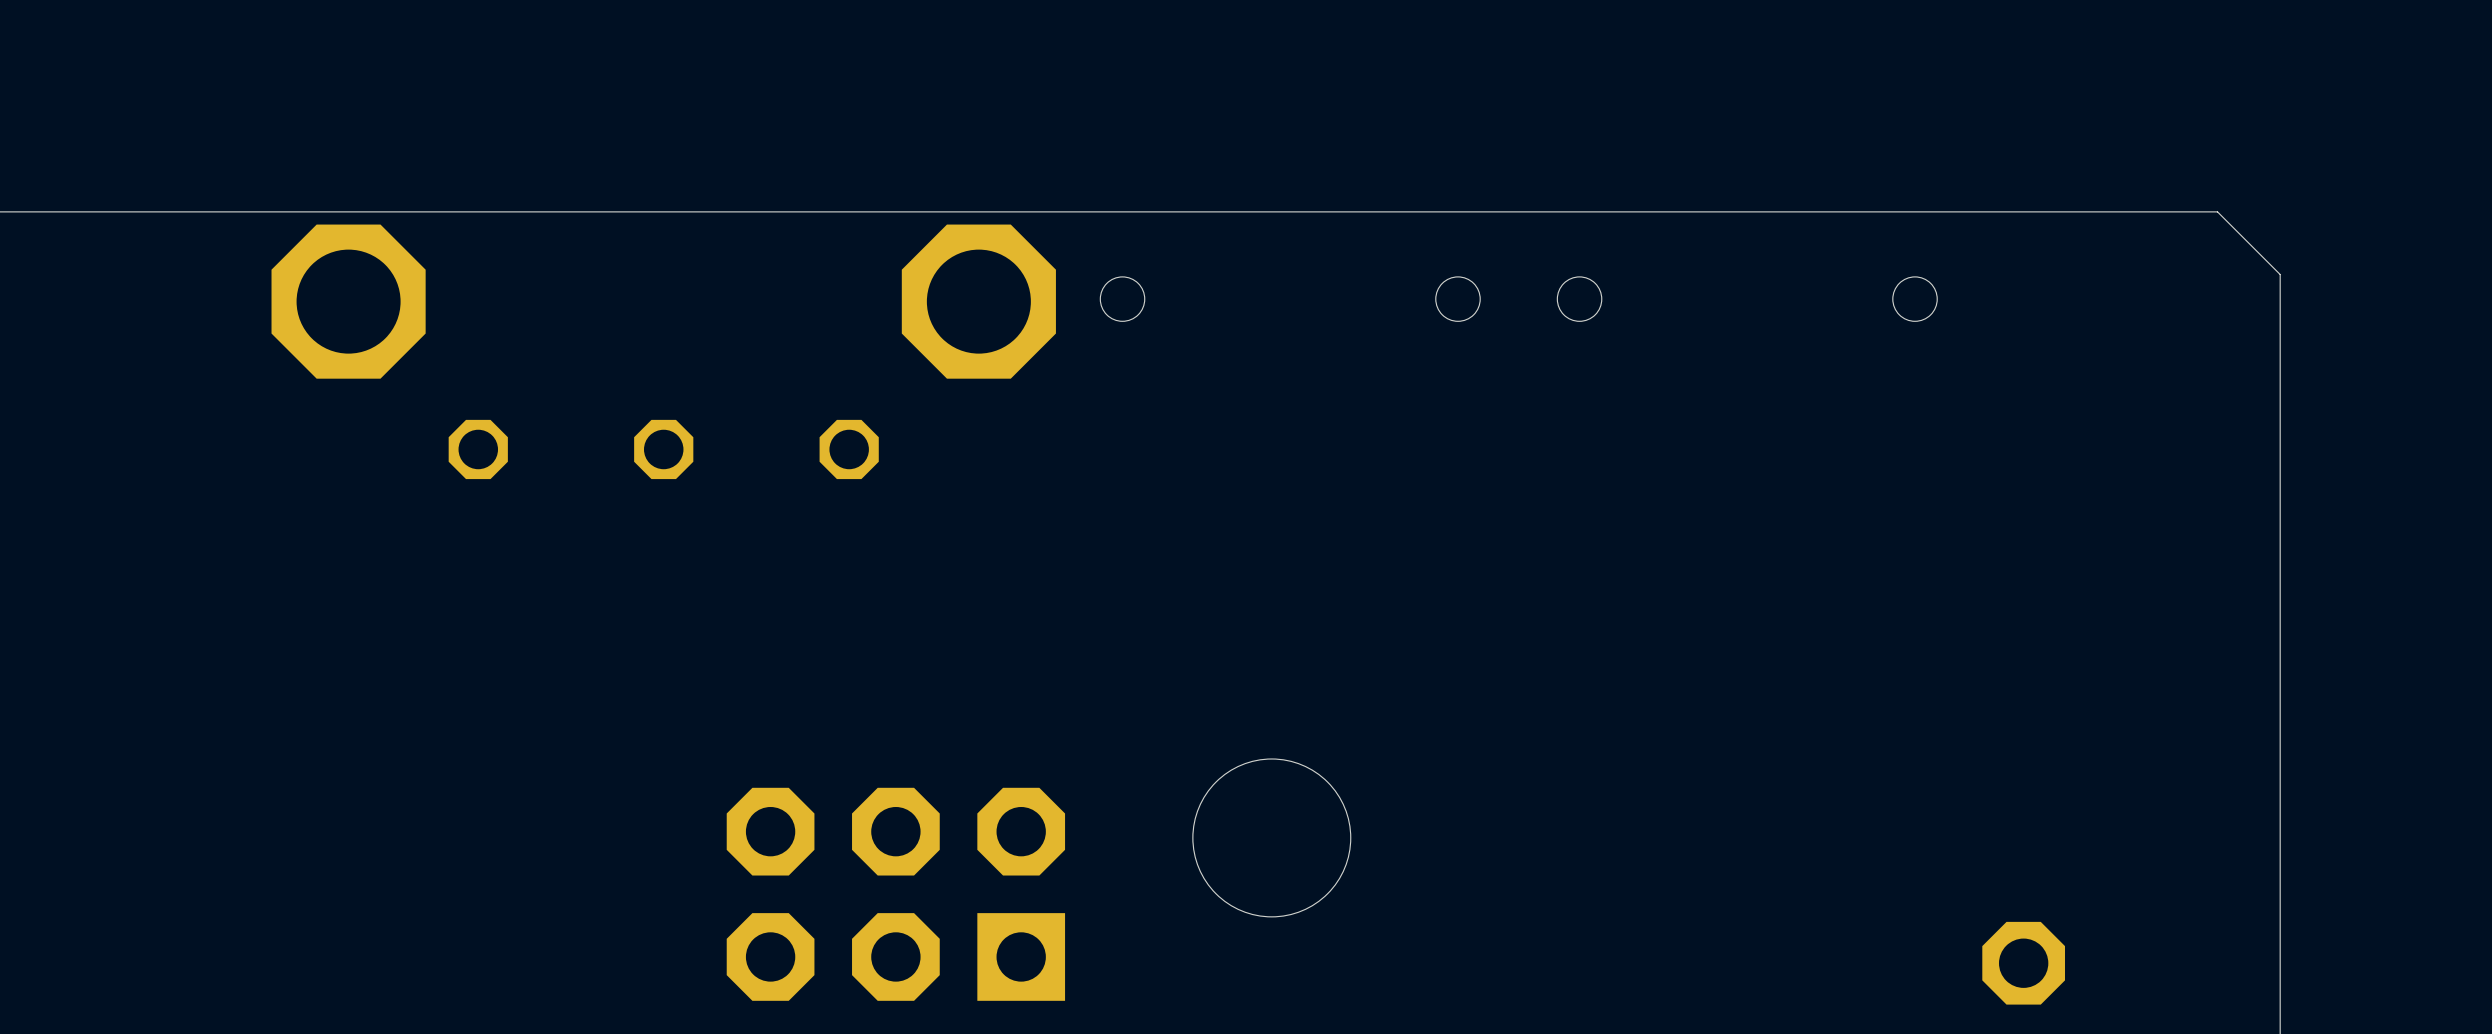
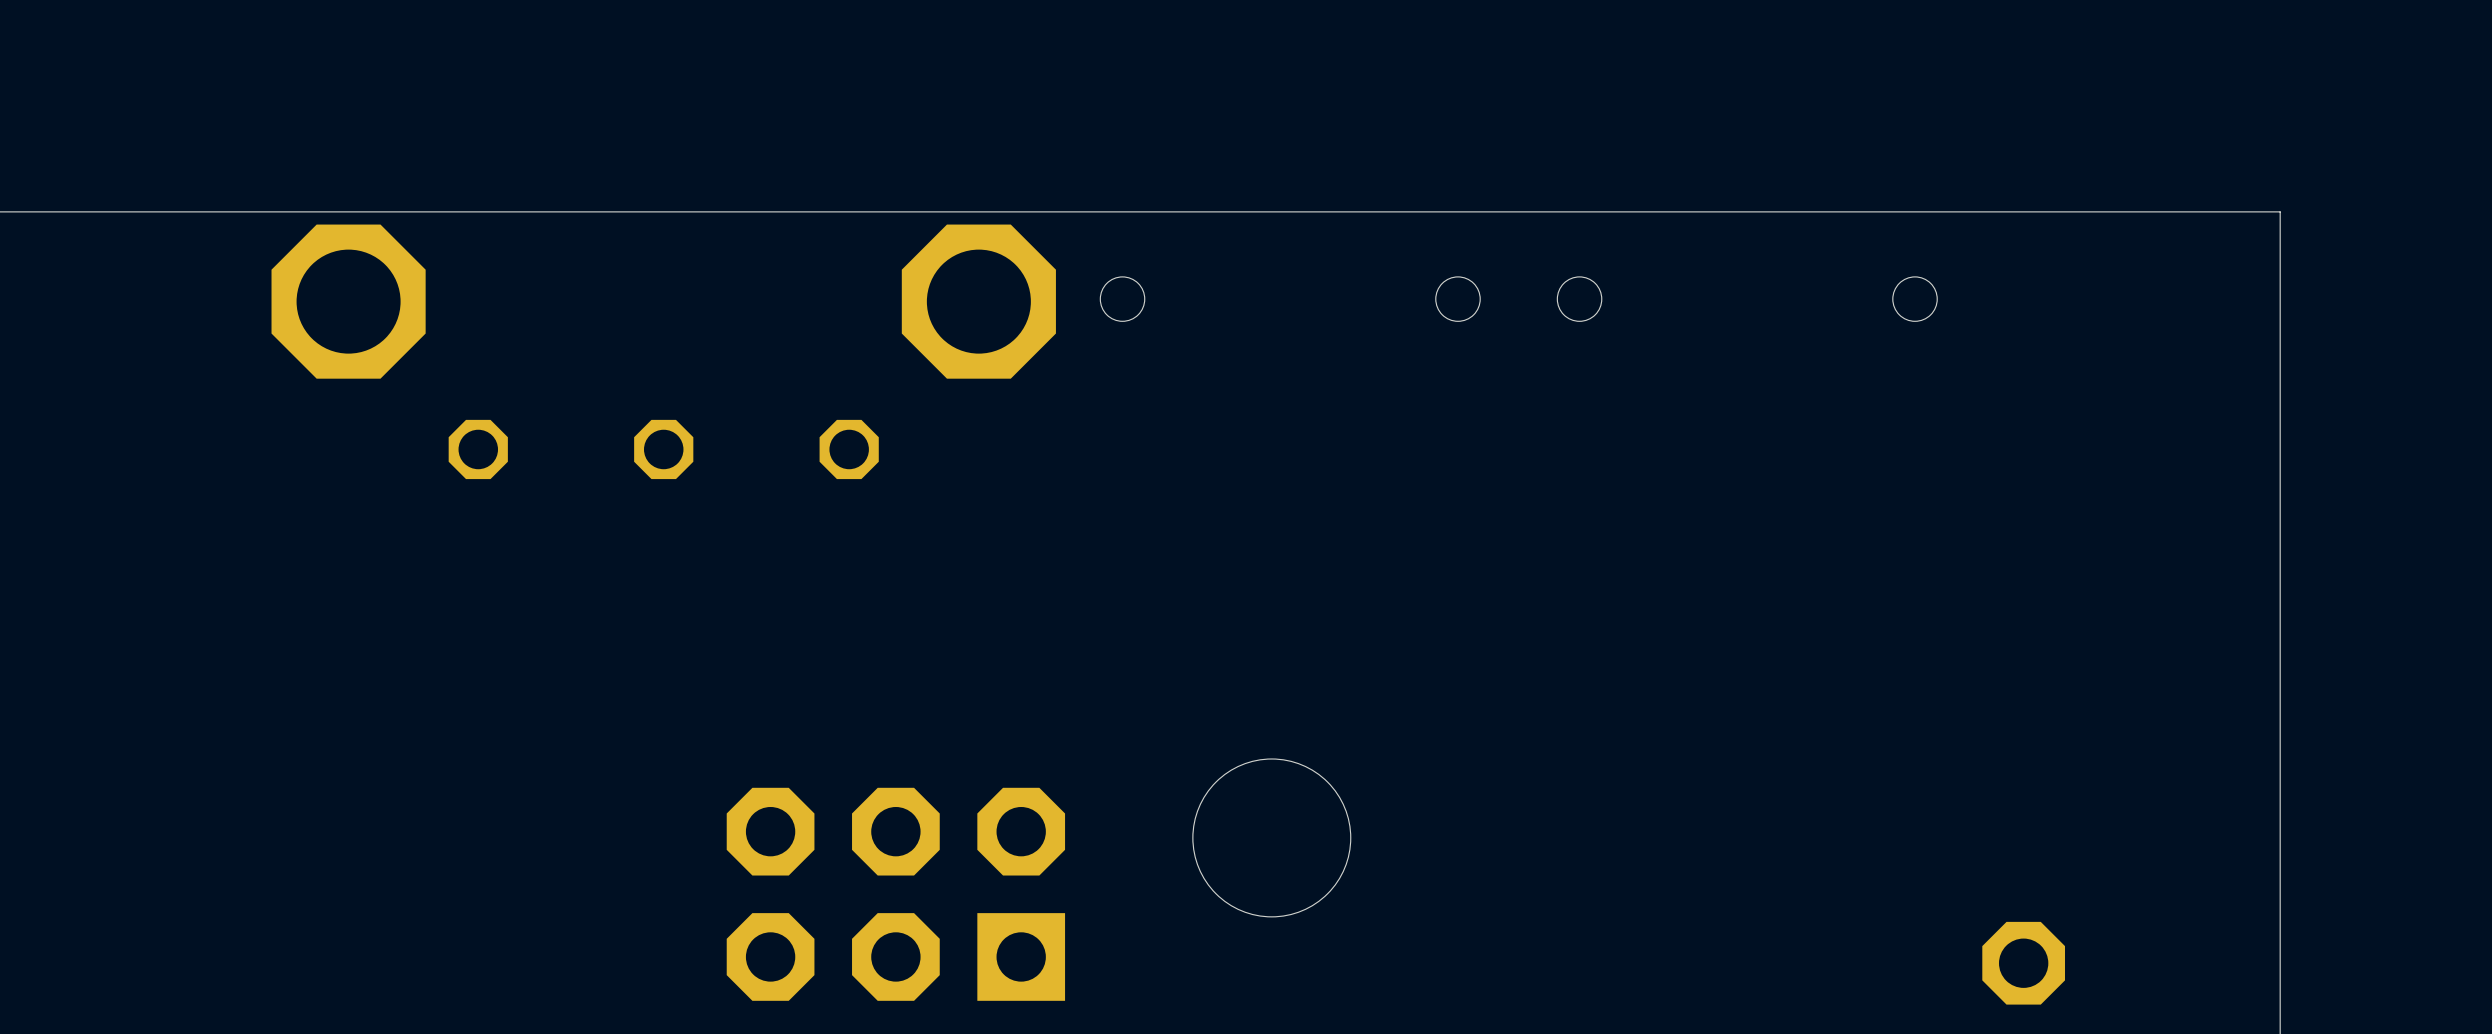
board edge: (2217, 211) (2280, 274) -> (2217, 211) (2280, 211) (2280, 274)

